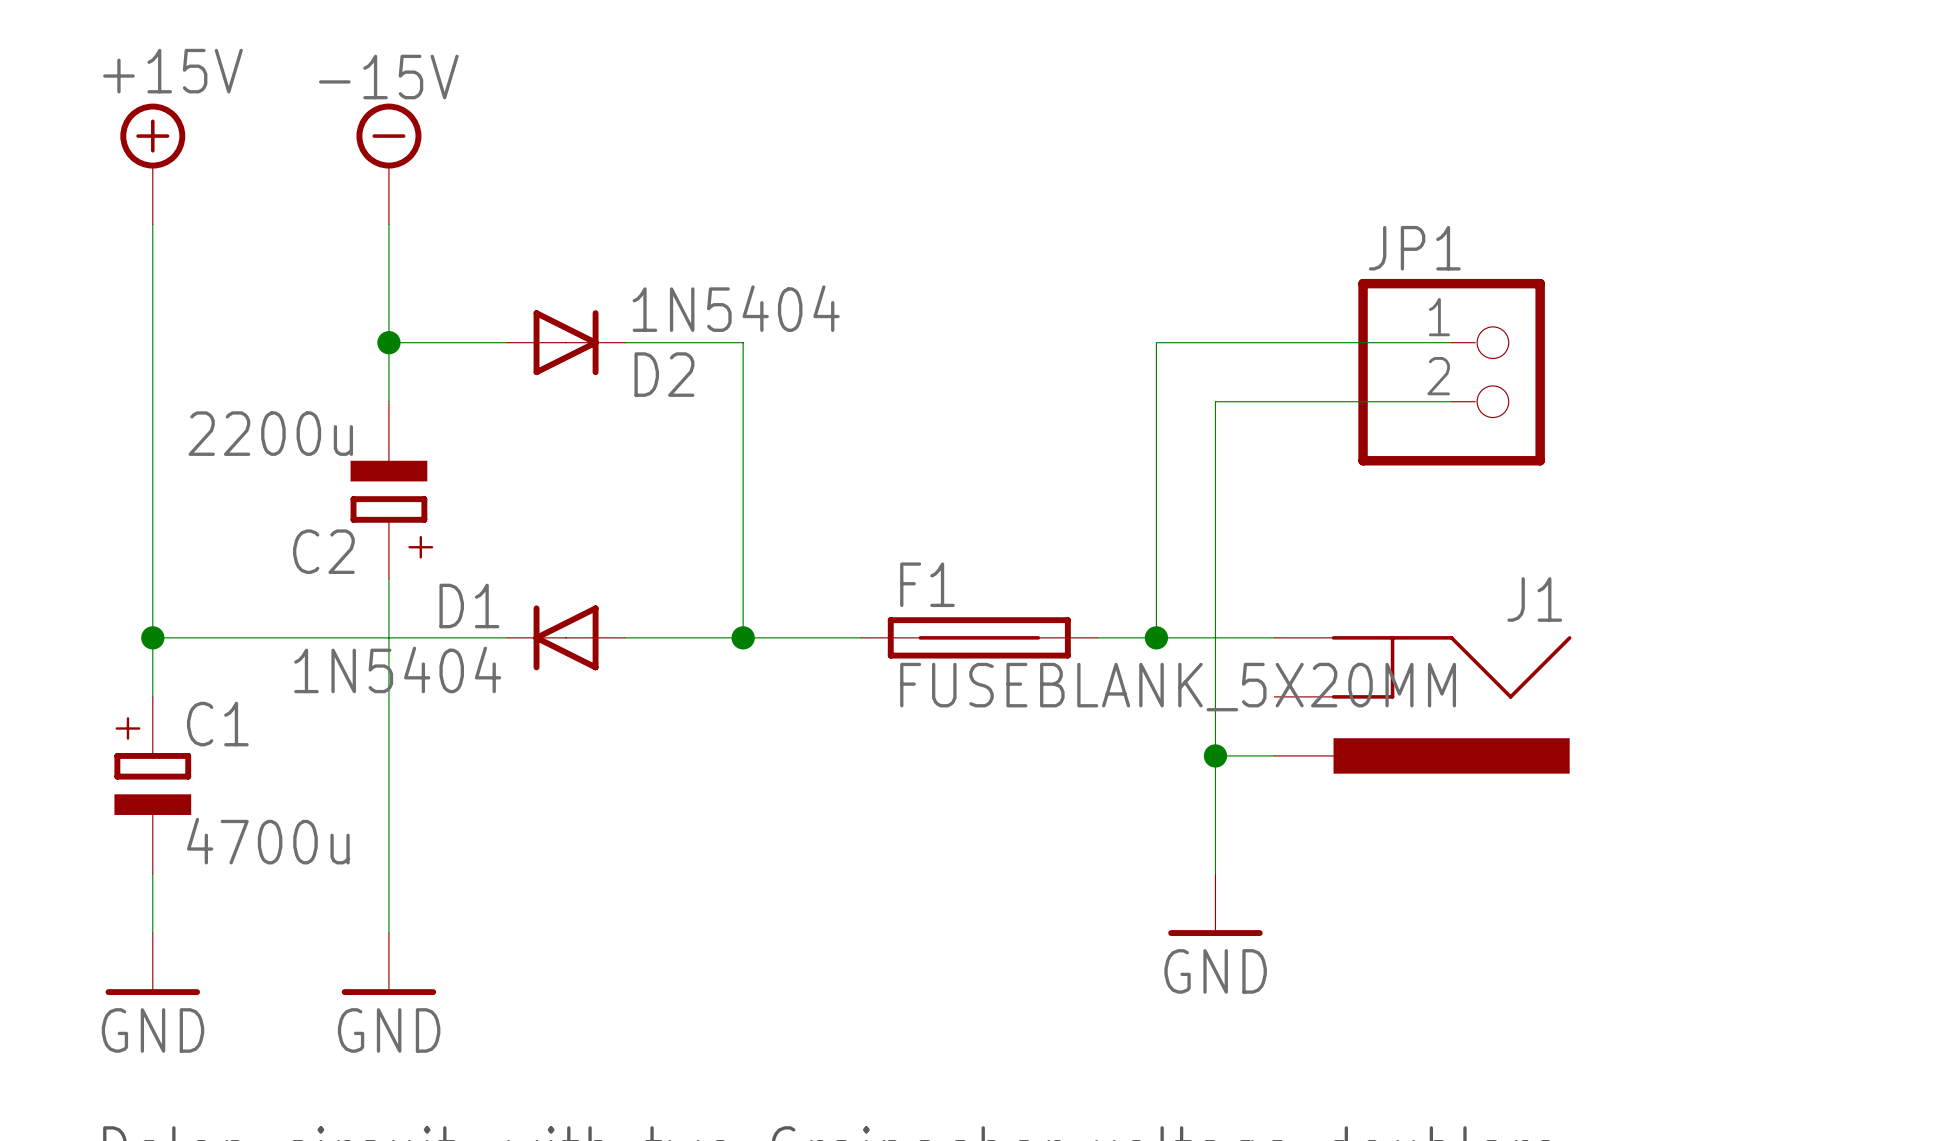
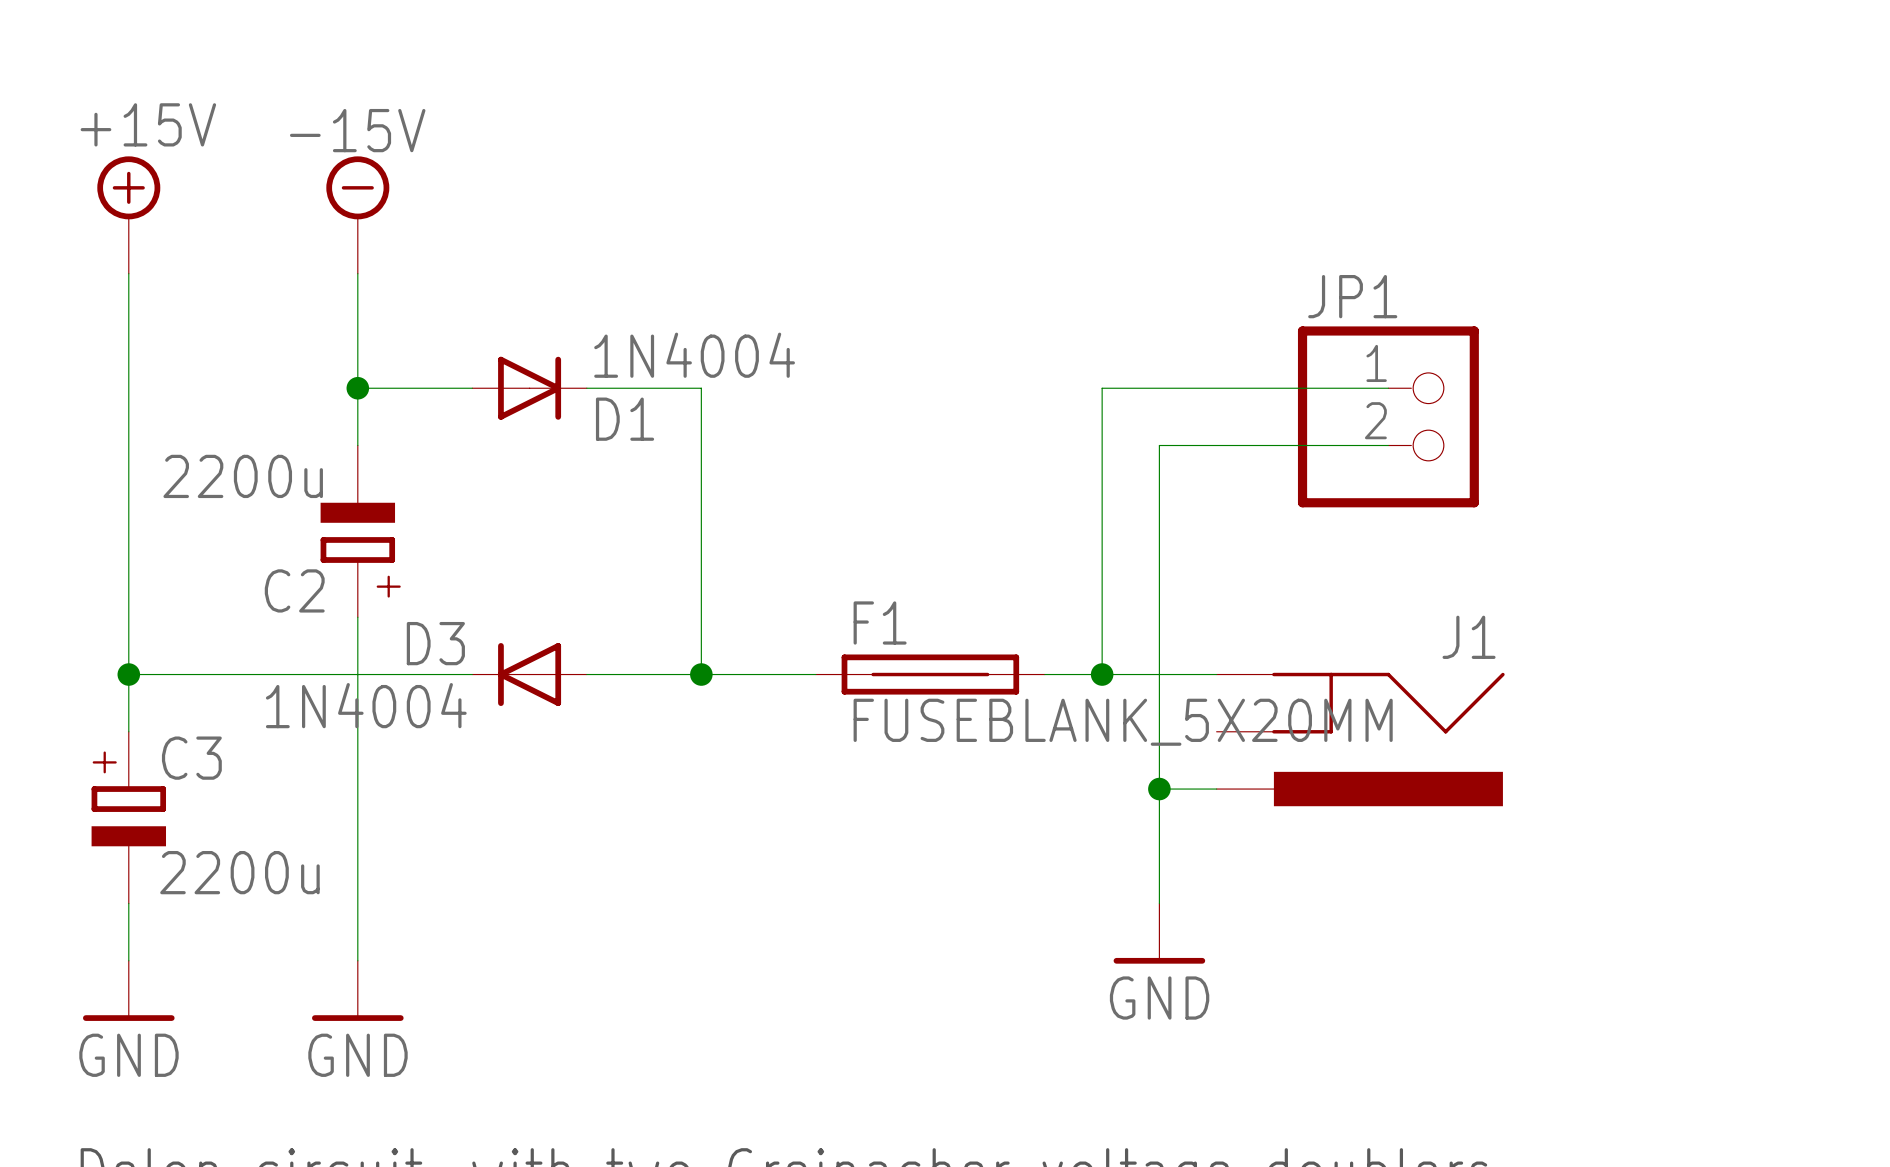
D2 value: 1N5404 (736, 308) -> 1N4004 (694, 355)
D2 name: D2 (664, 374) -> D1 (625, 419)
D1 name: D1 (469, 605) -> D3 (435, 643)
D1 value: 1N5404 (397, 669) -> 1N4004 (366, 705)
C1 name: C1 (217, 724) -> C3 (191, 758)
C1 value: 4700u (268, 841) -> 2200u (239, 872)

